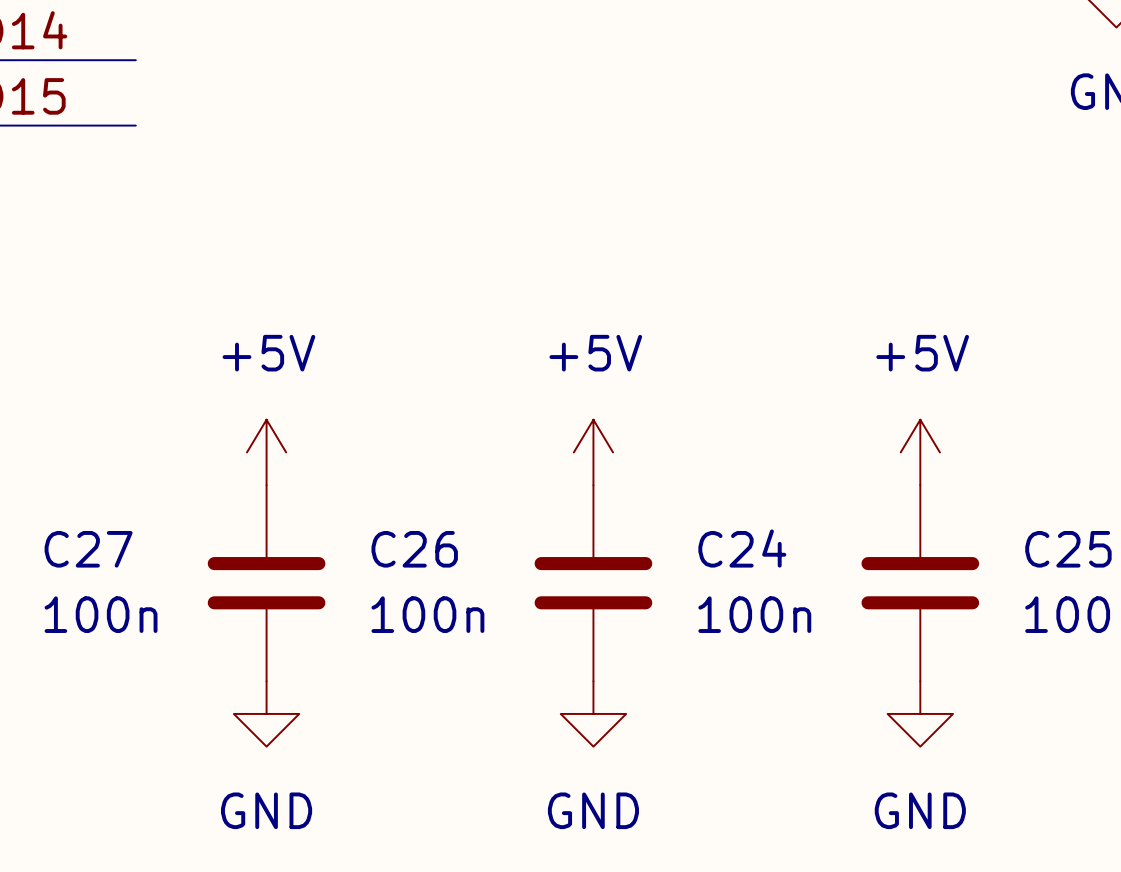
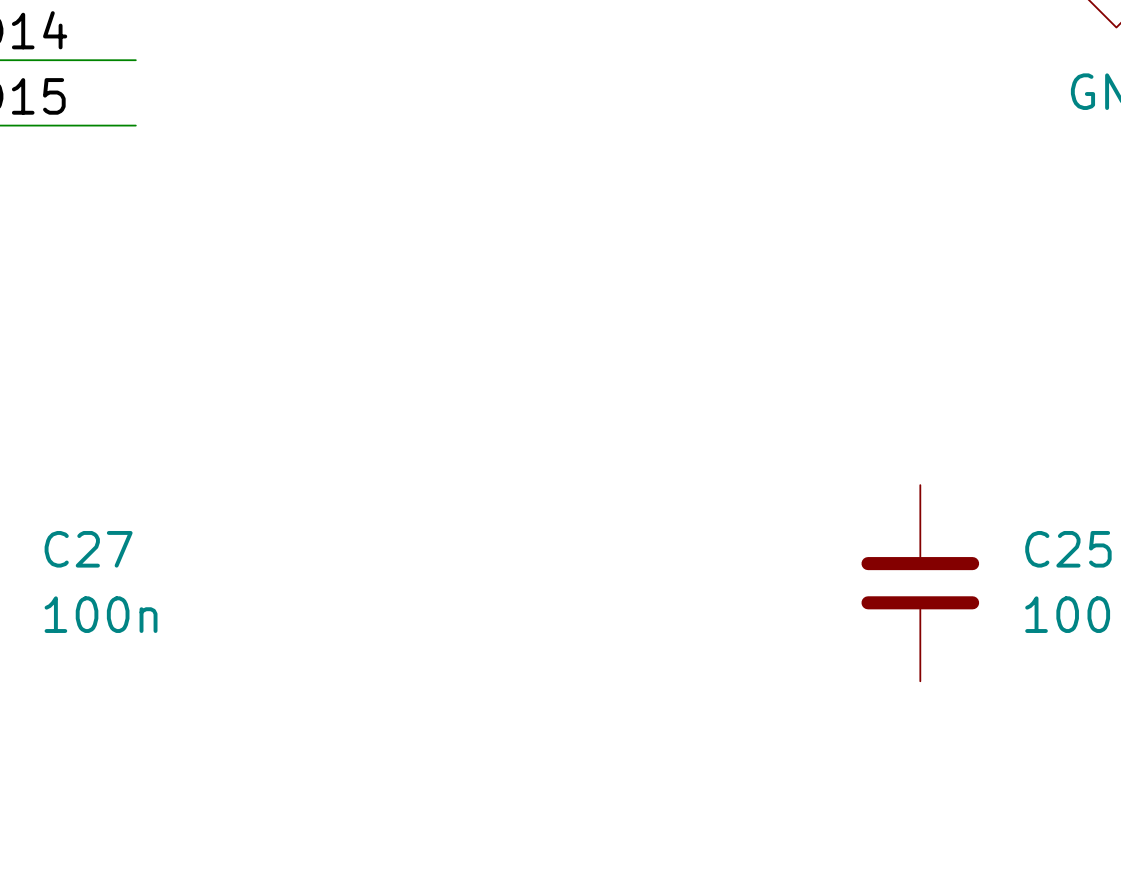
power symbol: +5V (266, 452) -> none
power symbol: +5V (593, 452) -> none
power symbol: +5V (920, 452) -> none
C26: 100n (266, 583) -> none
C24: 100n (593, 583) -> none
power symbol: GND (266, 713) -> none
power symbol: GND (593, 713) -> none
power symbol: GND (920, 713) -> none

